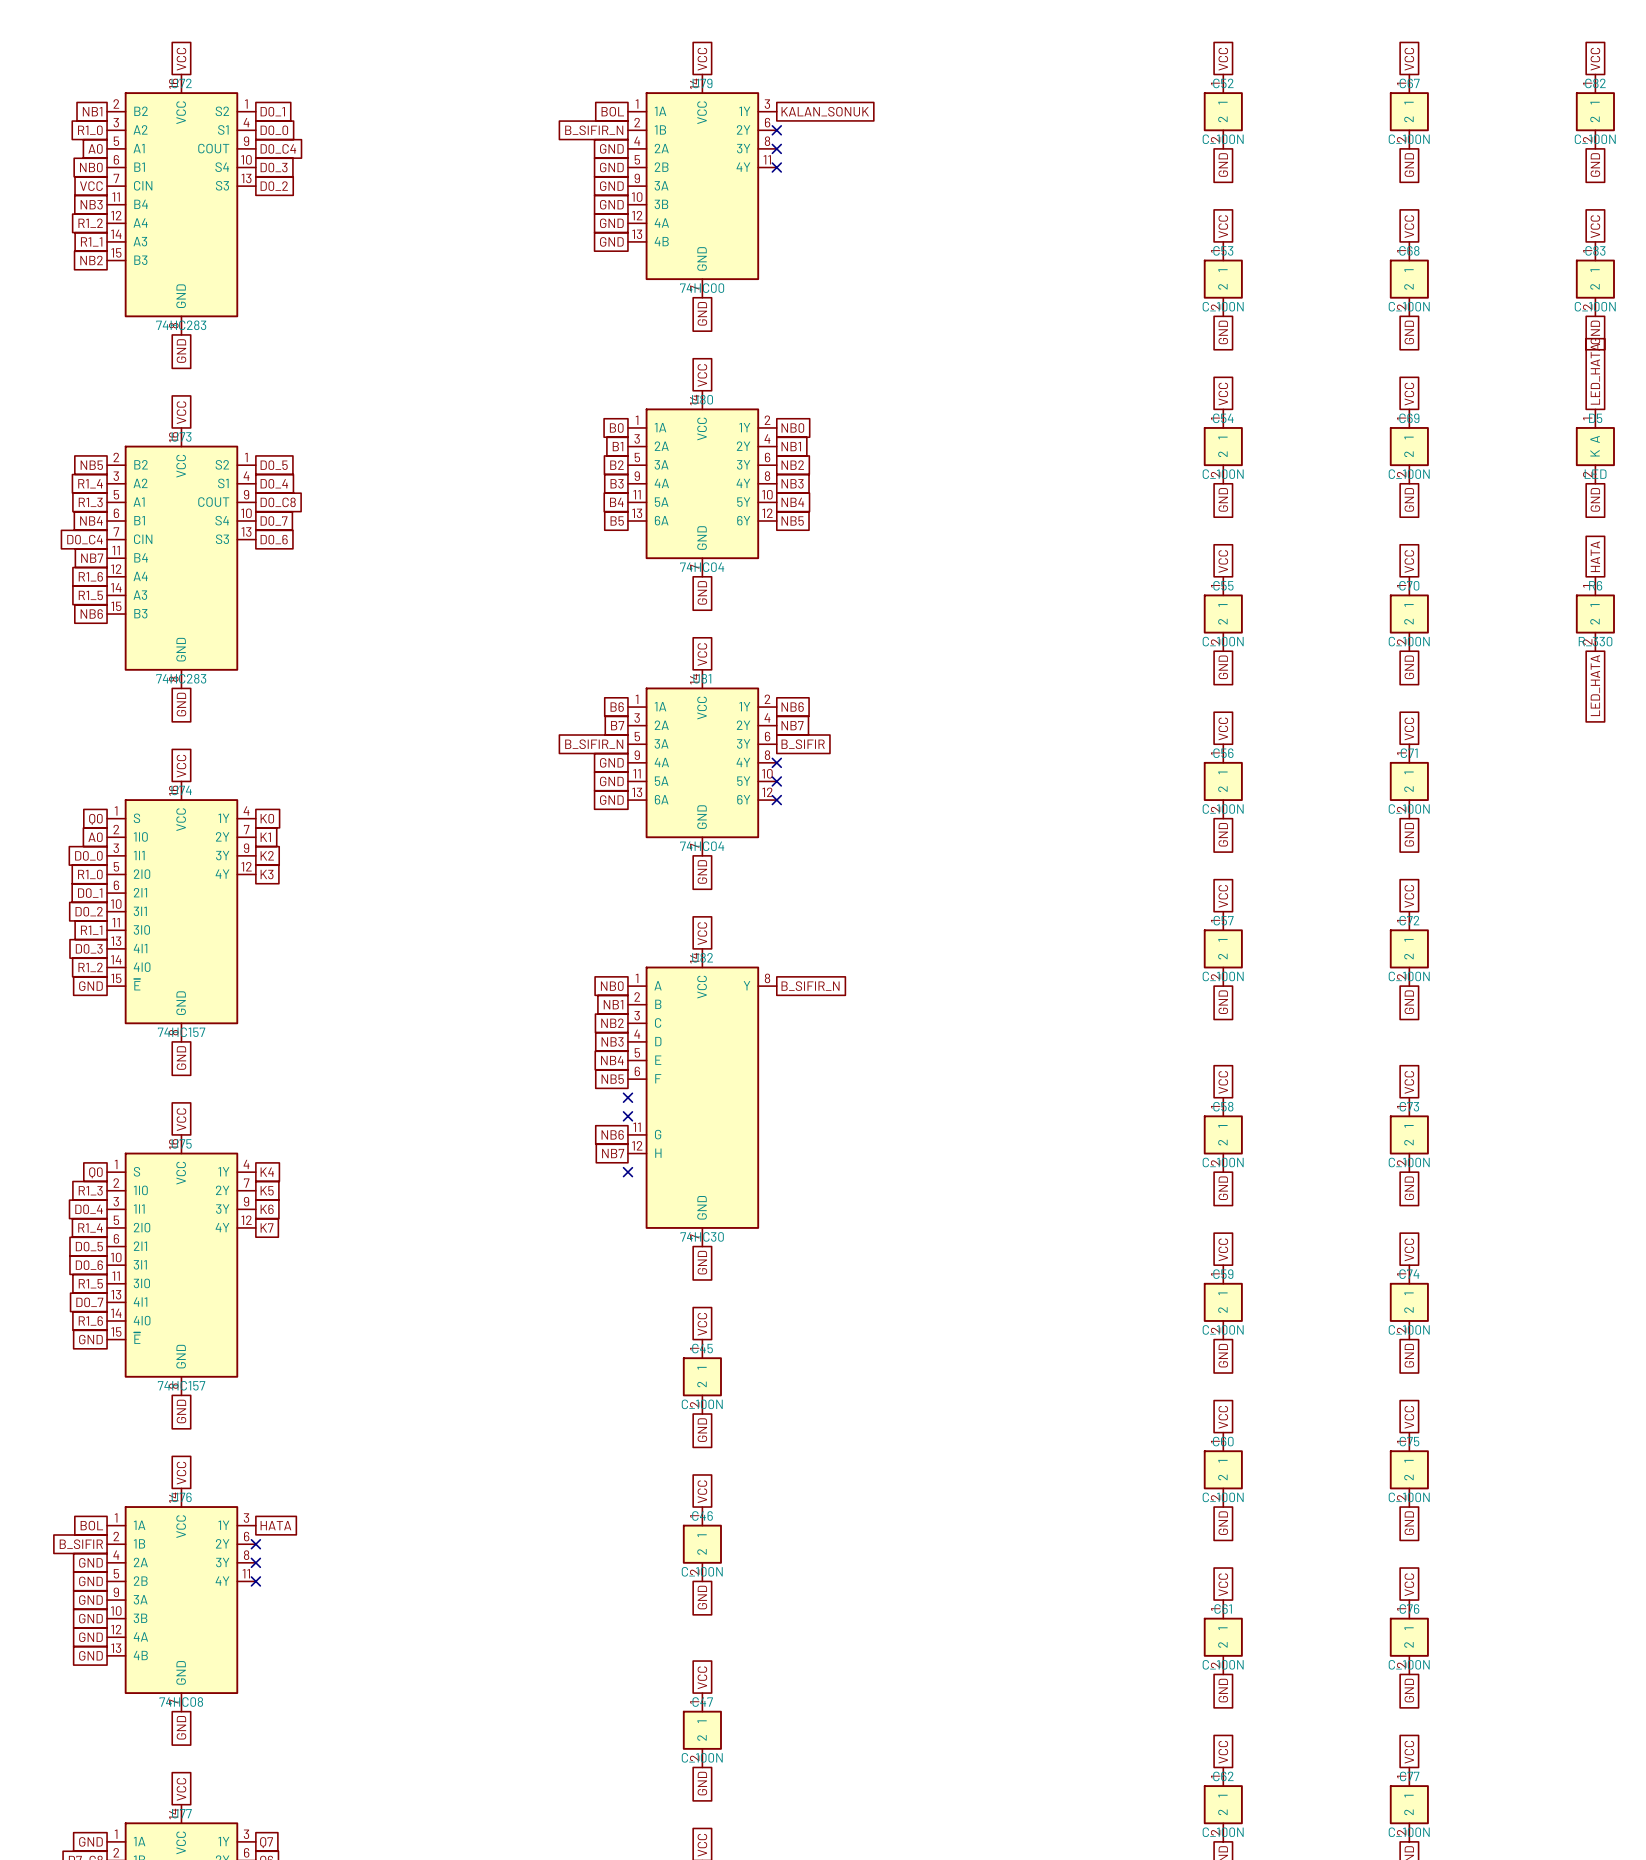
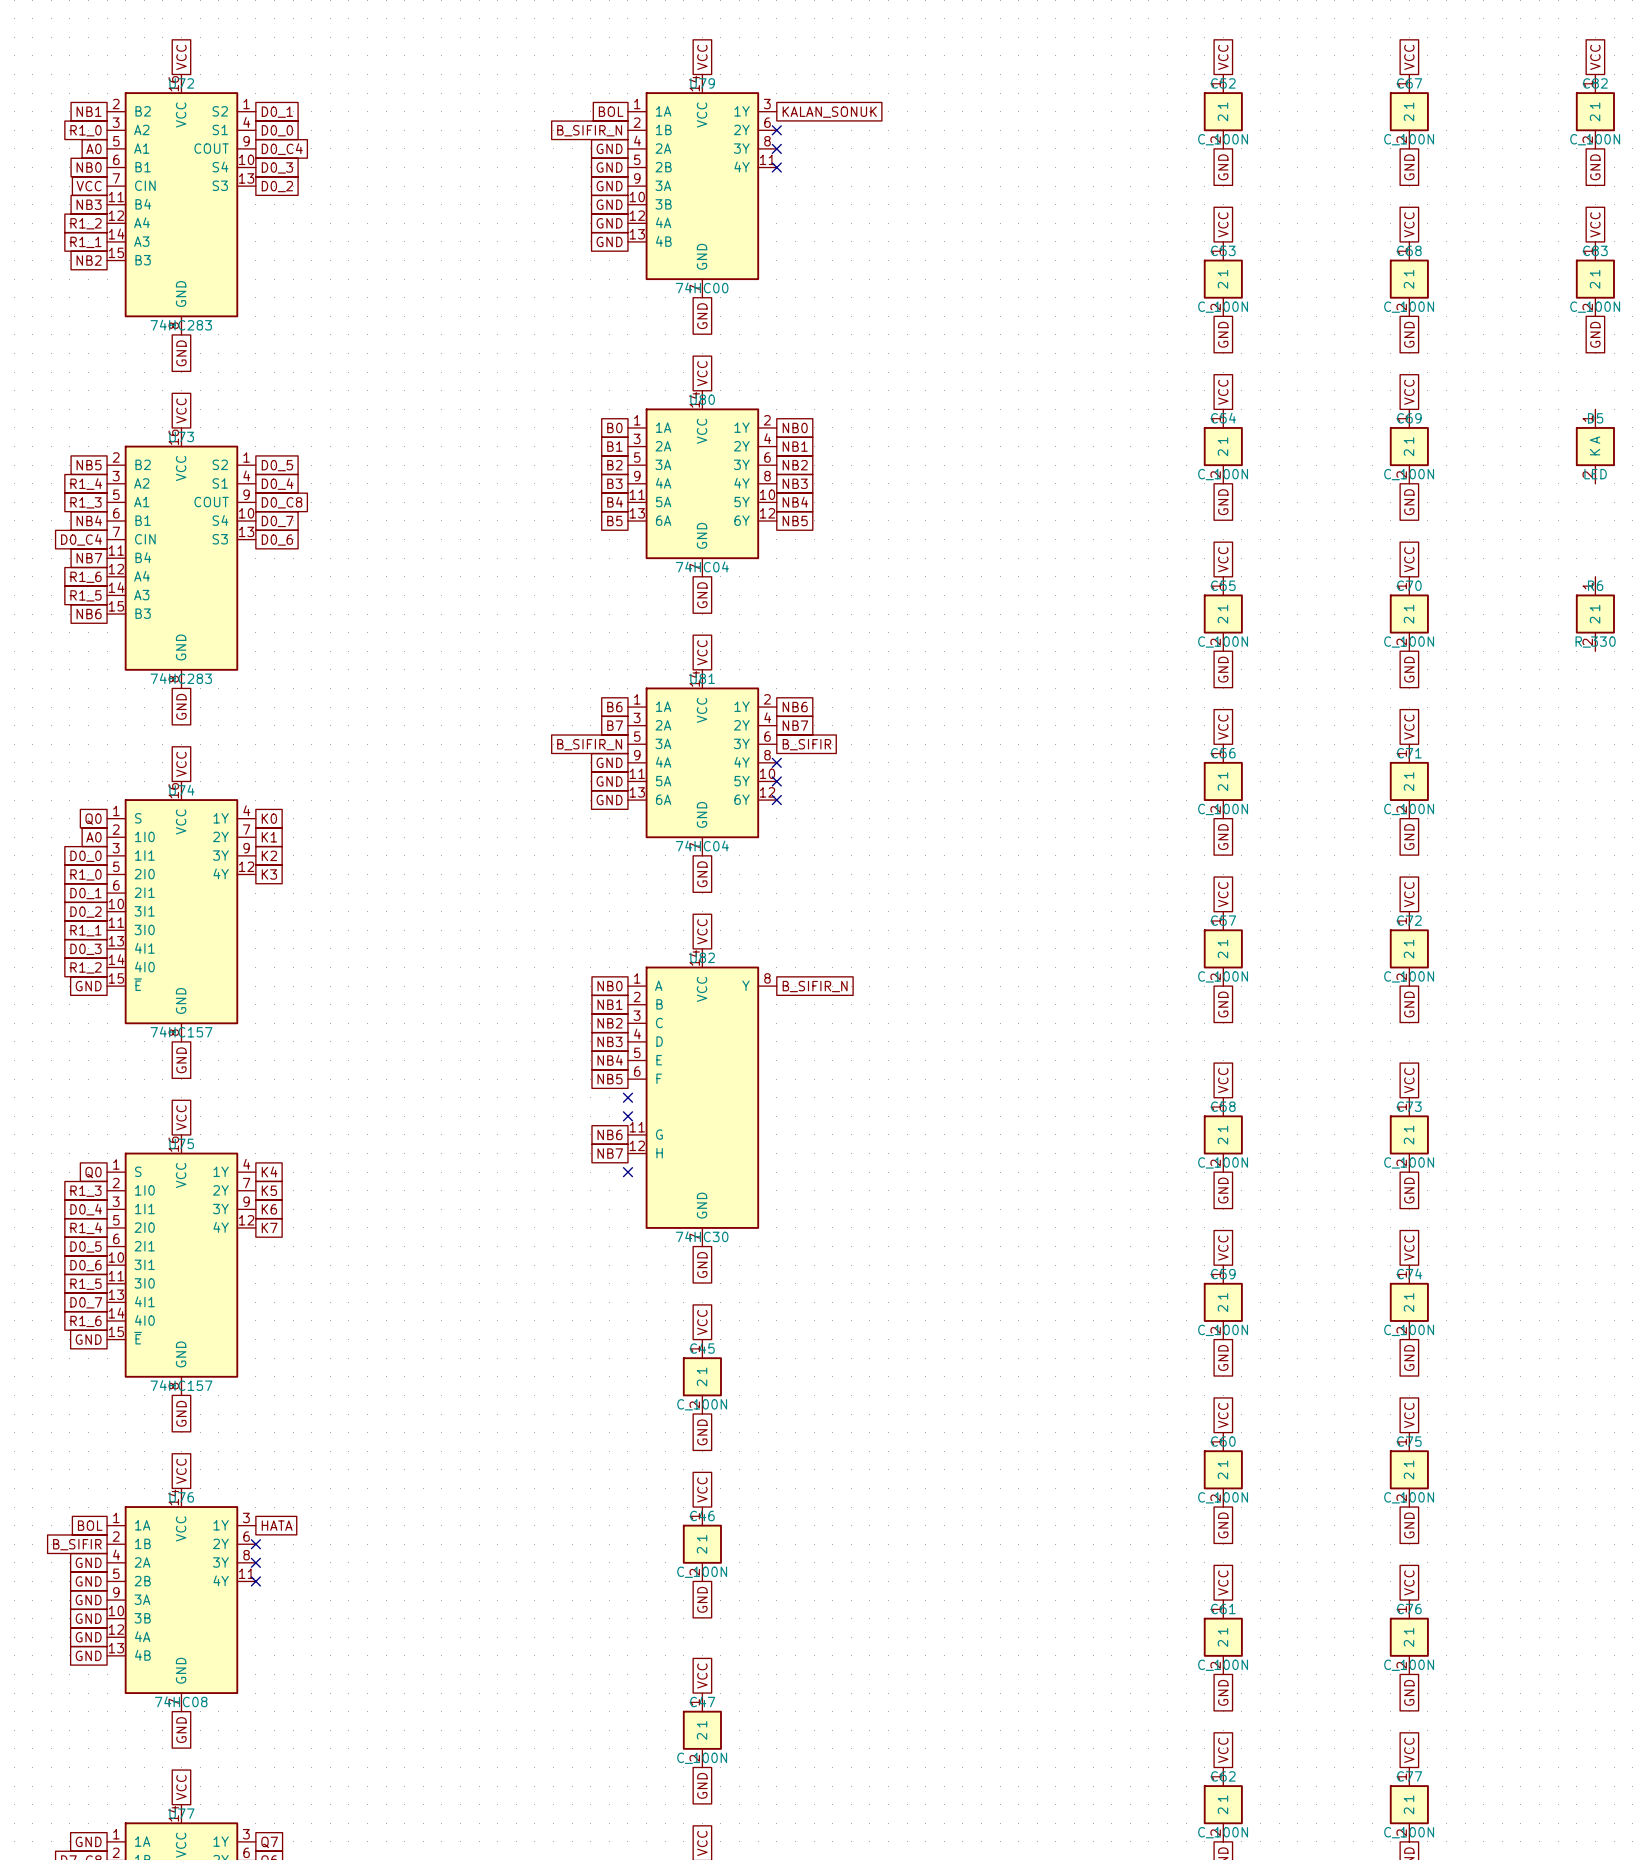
global label: LED_HATA (1595, 374) -> none
global label: GND (1595, 499) -> none
global label: HATA (1595, 556) -> none
global label: LED_HATA (1595, 685) -> none

